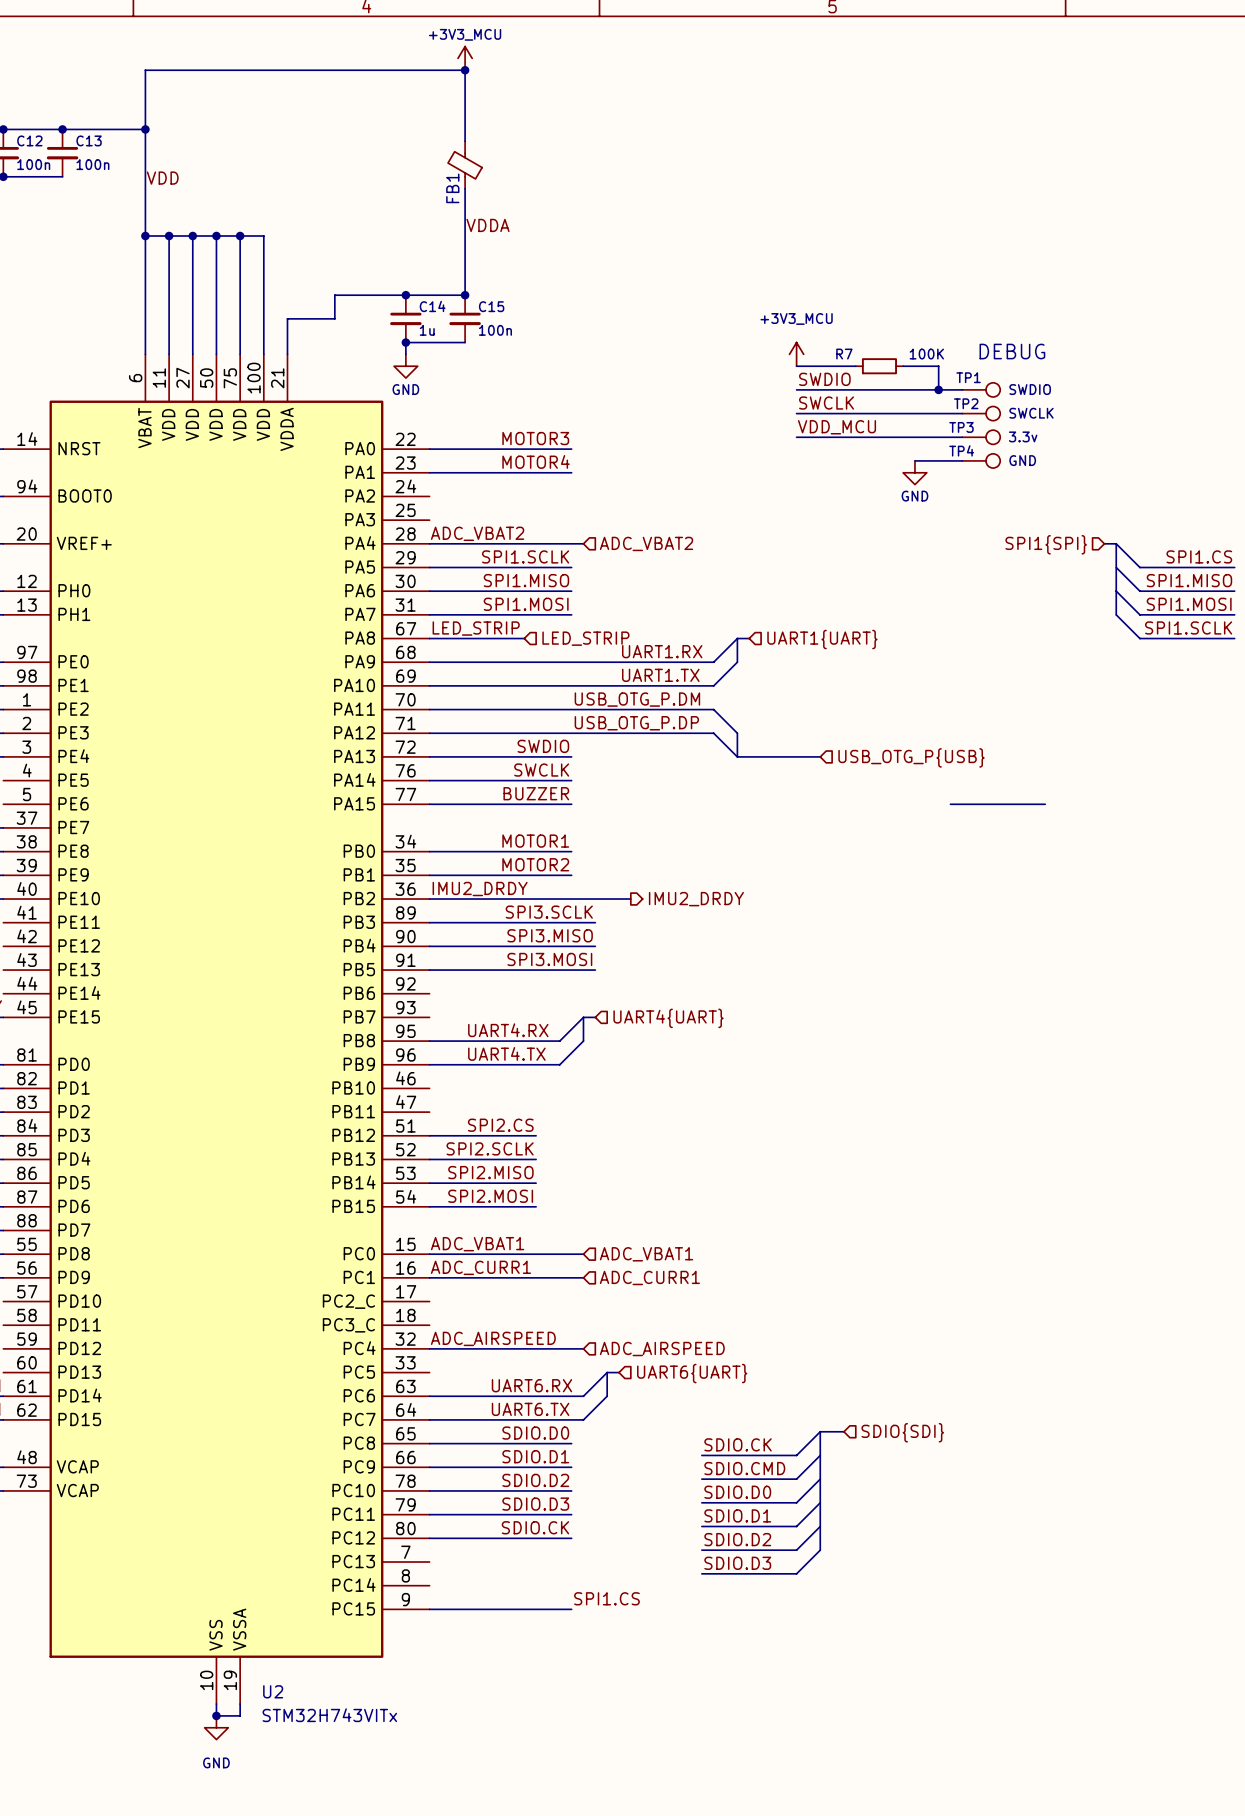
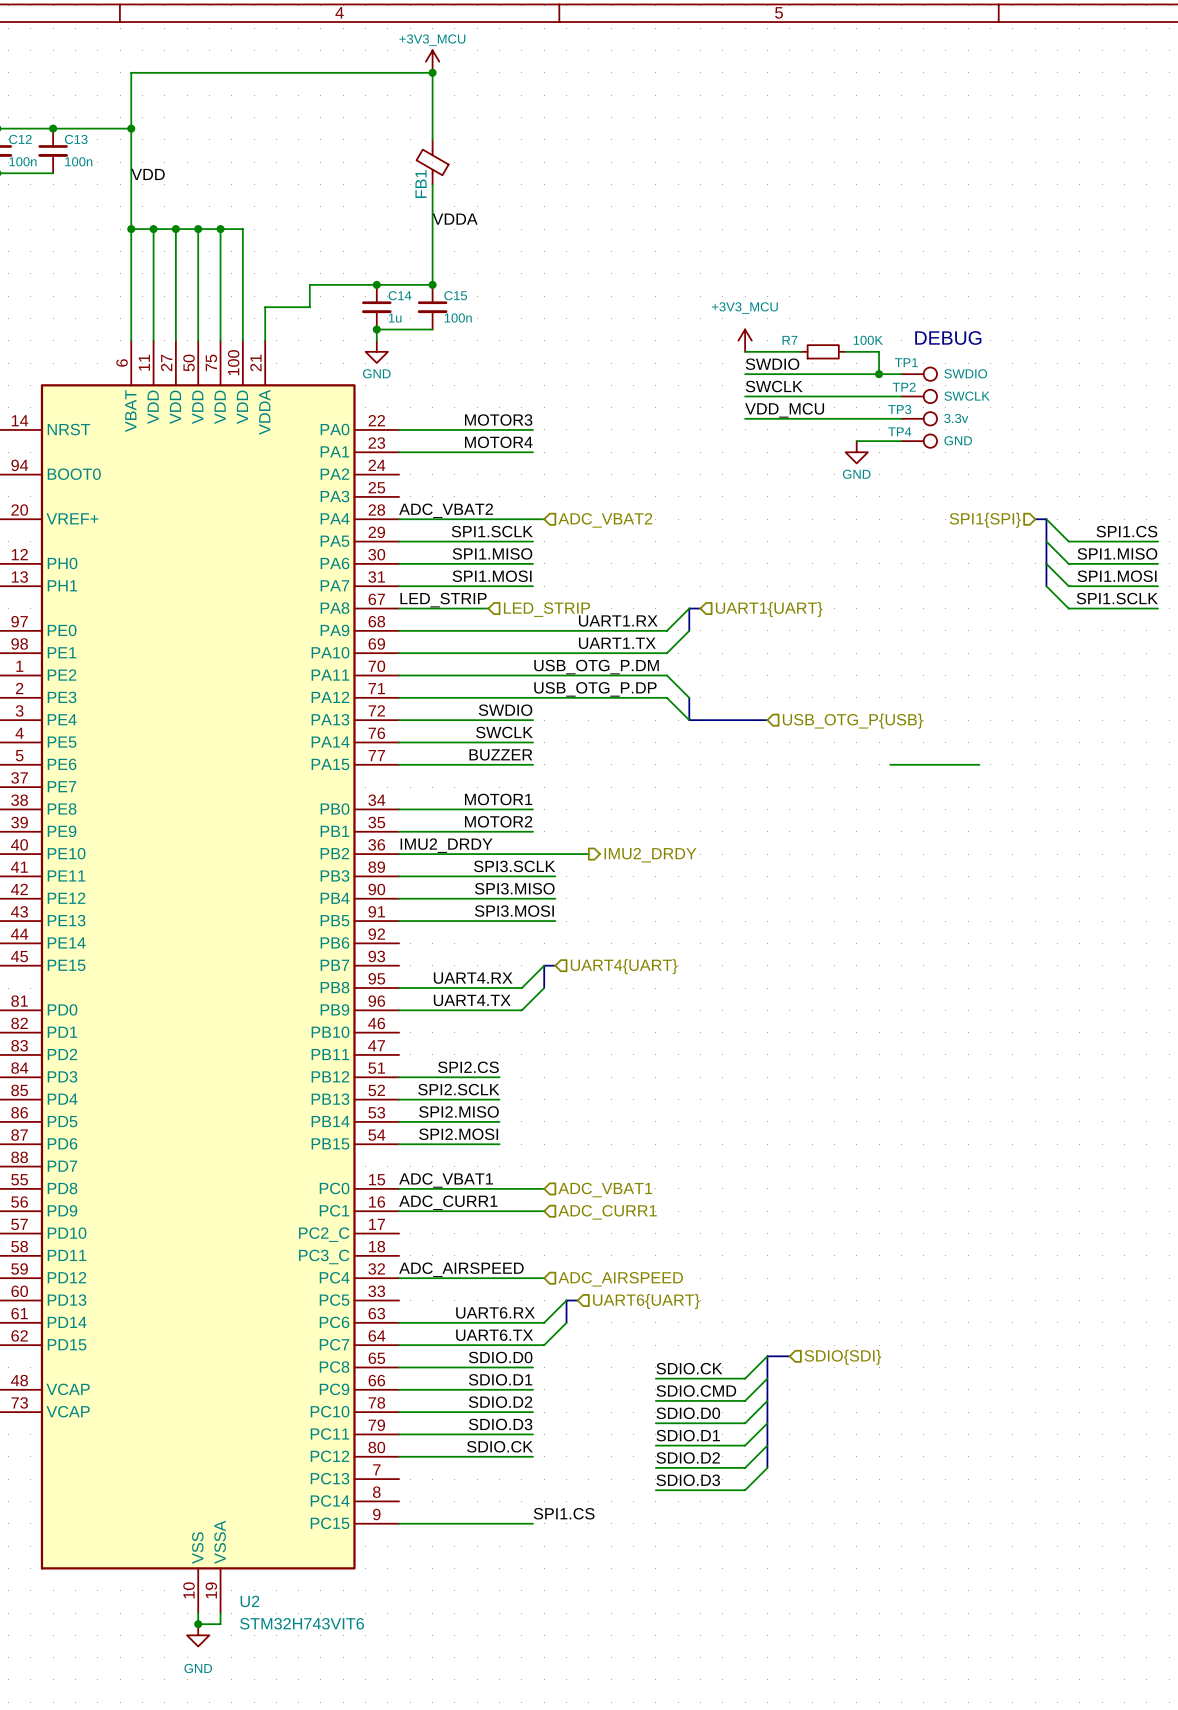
U2 value: STM32H743VITx (329, 1715) -> STM32H743VIT6 (302, 1623)

